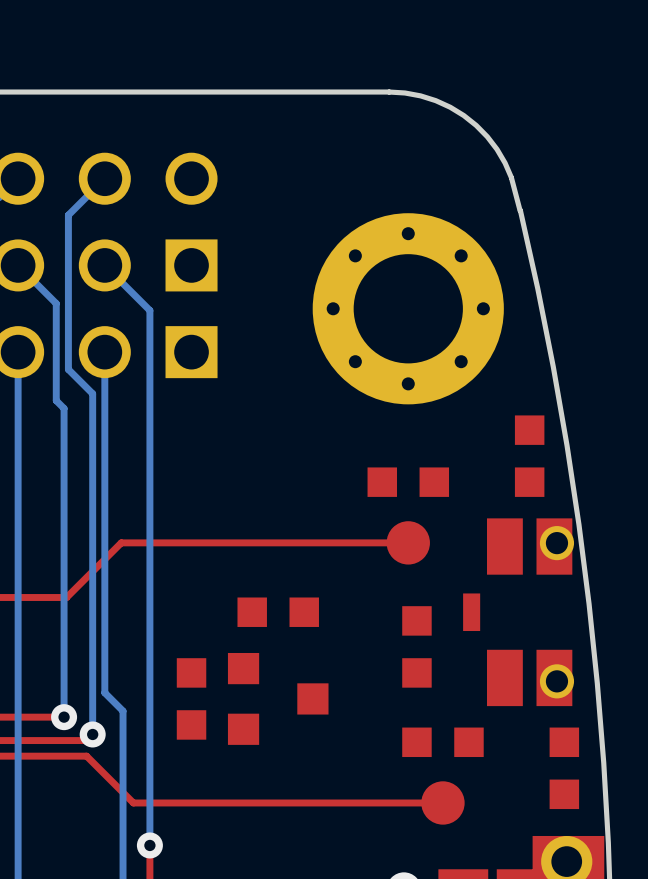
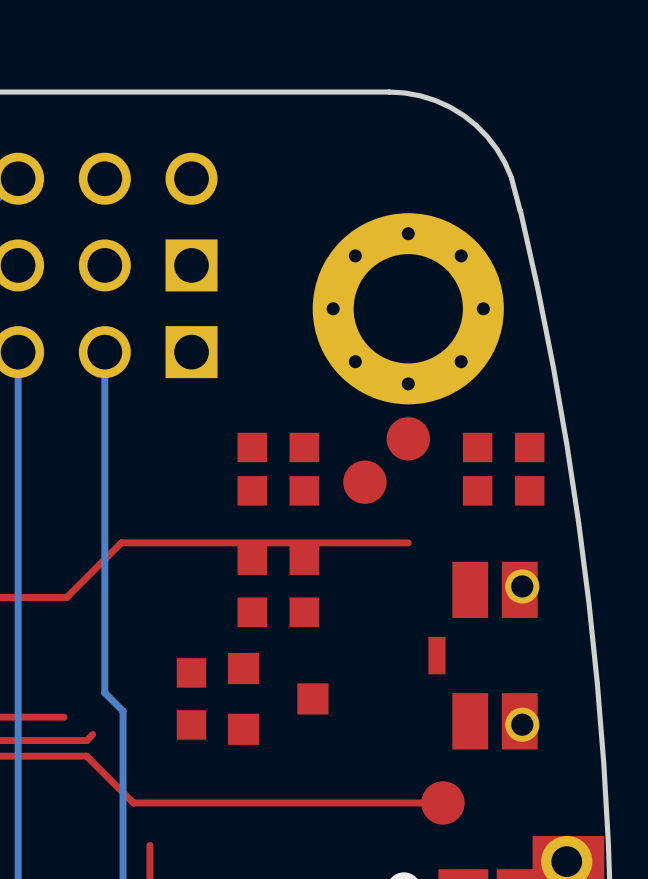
bottom track: (104, 178) (68, 215) (68, 369) (92, 393) (92, 734) -> none
bottom track: (18, 265) (56, 303) (56, 400) (64, 408) (64, 717) -> none
bottom track: (104, 265) (149, 310) (149, 845) -> none
part: none -> (408, 438)
part: none -> (278, 447)
part: none -> (503, 447)
part: (529, 456) -> none
part: none -> (364, 482)
part: (408, 482) -> none
part: none -> (278, 490)
part: none -> (503, 490)
part: (408, 542) -> none
part: none -> (278, 560)
part position: (518, 612) -> (483, 655)
part: (416, 646) -> none
via: (64, 717) -> none
via: (92, 734) -> none
part: (442, 742) -> none
part: (564, 768) -> none
via: (149, 845) -> none

